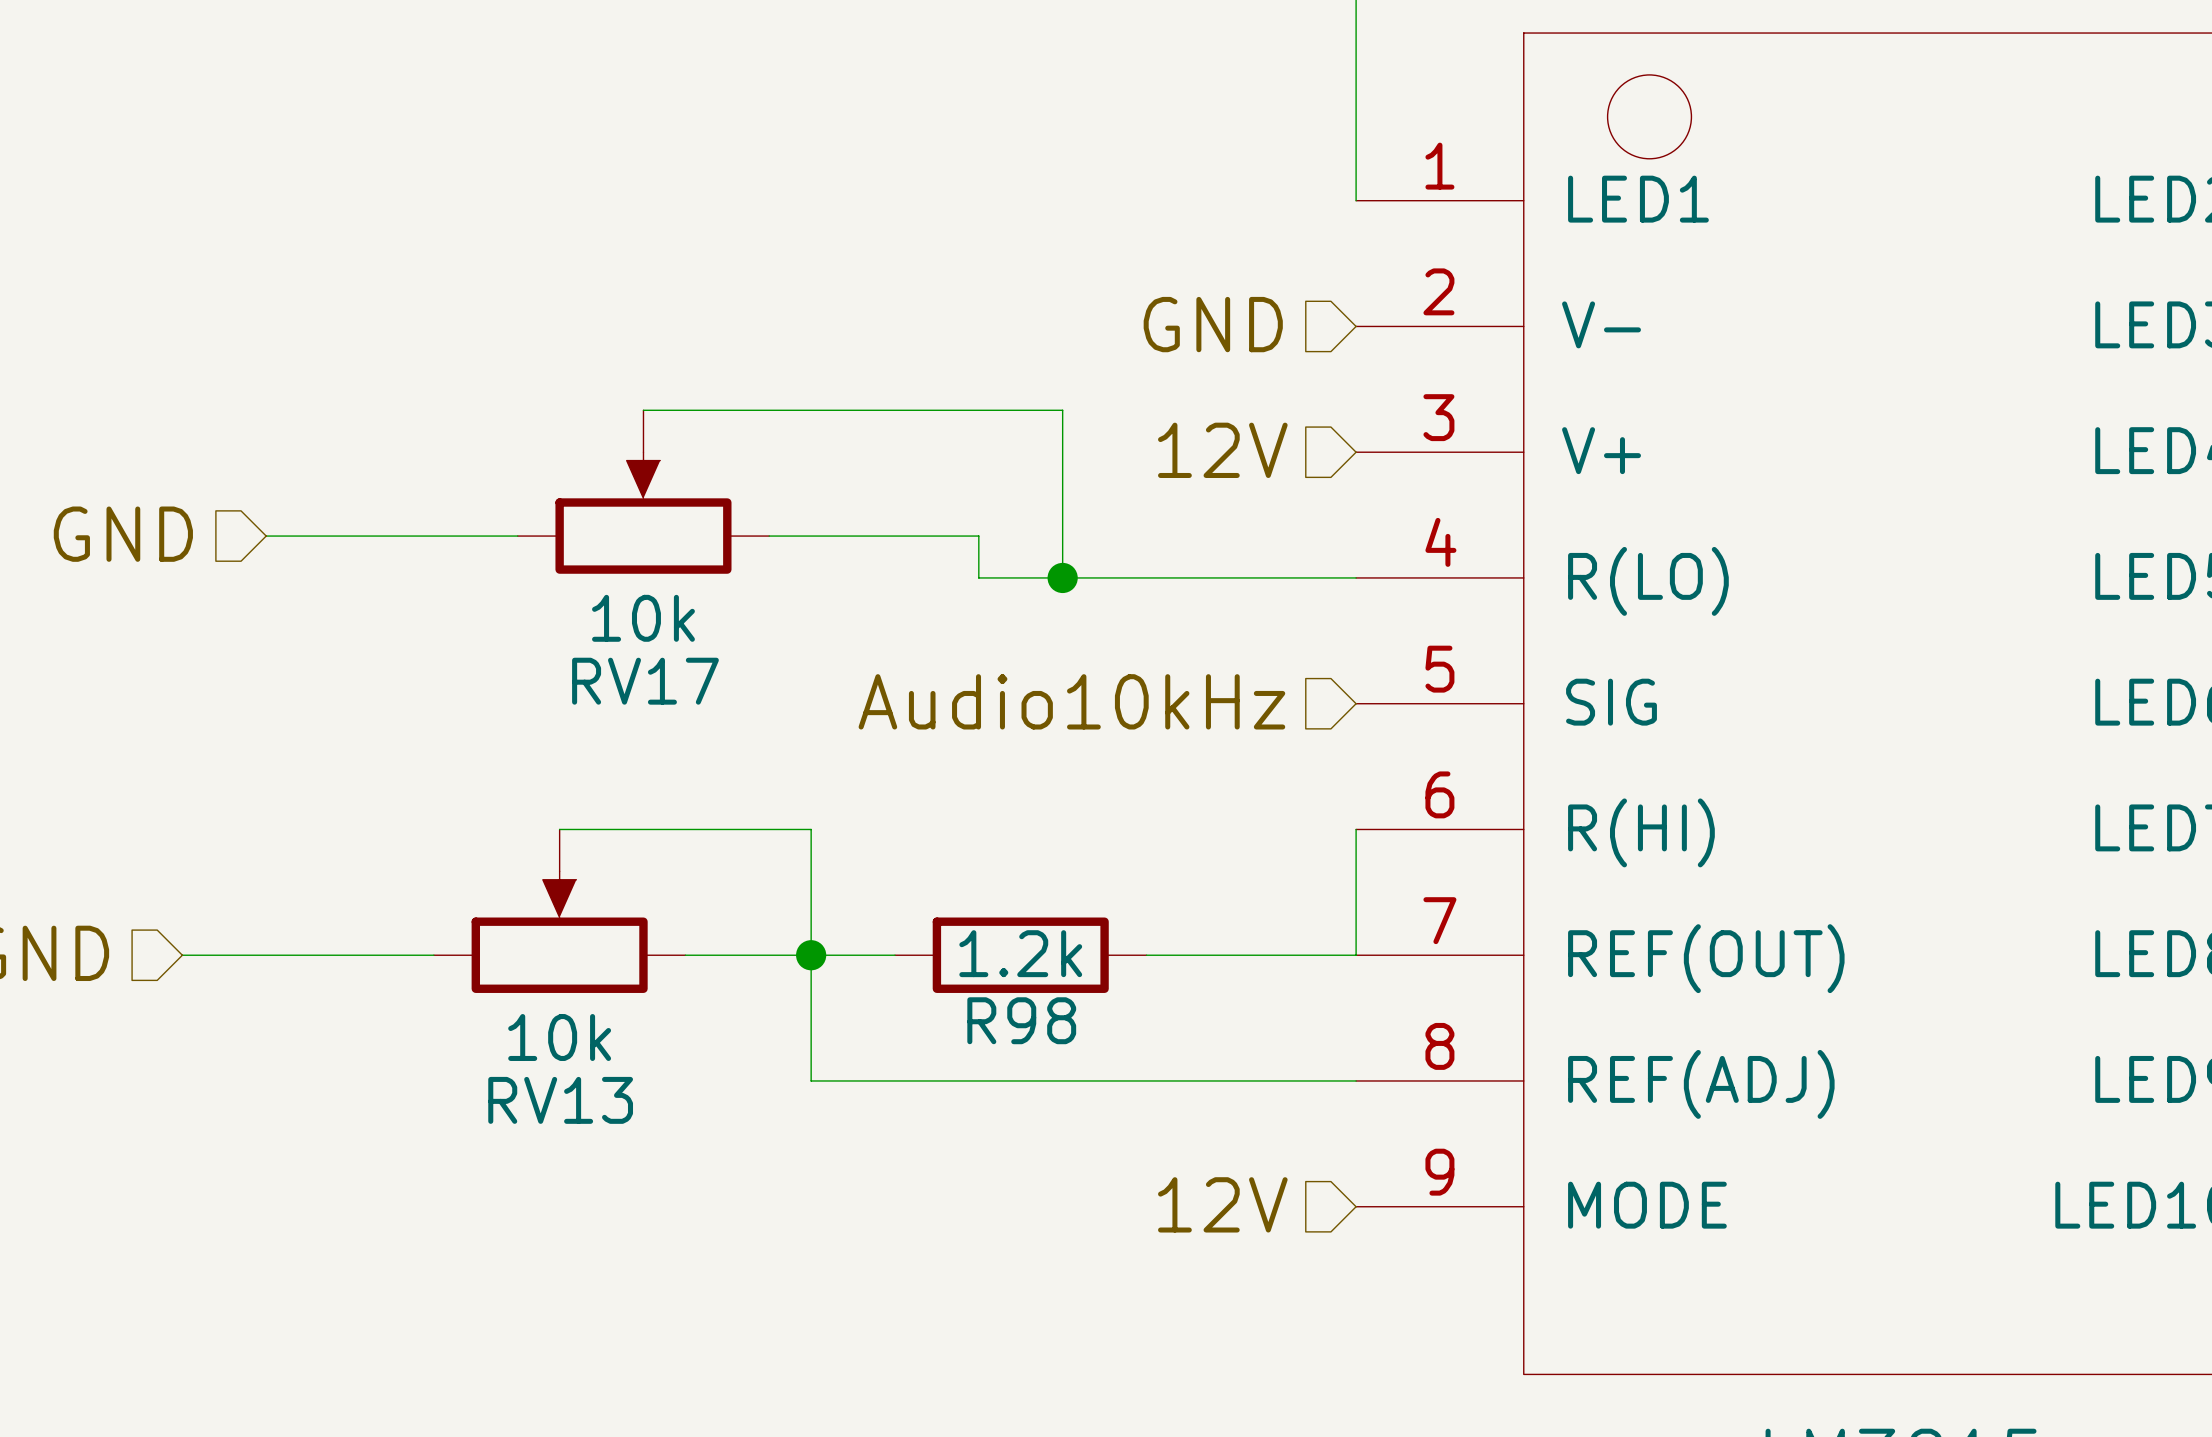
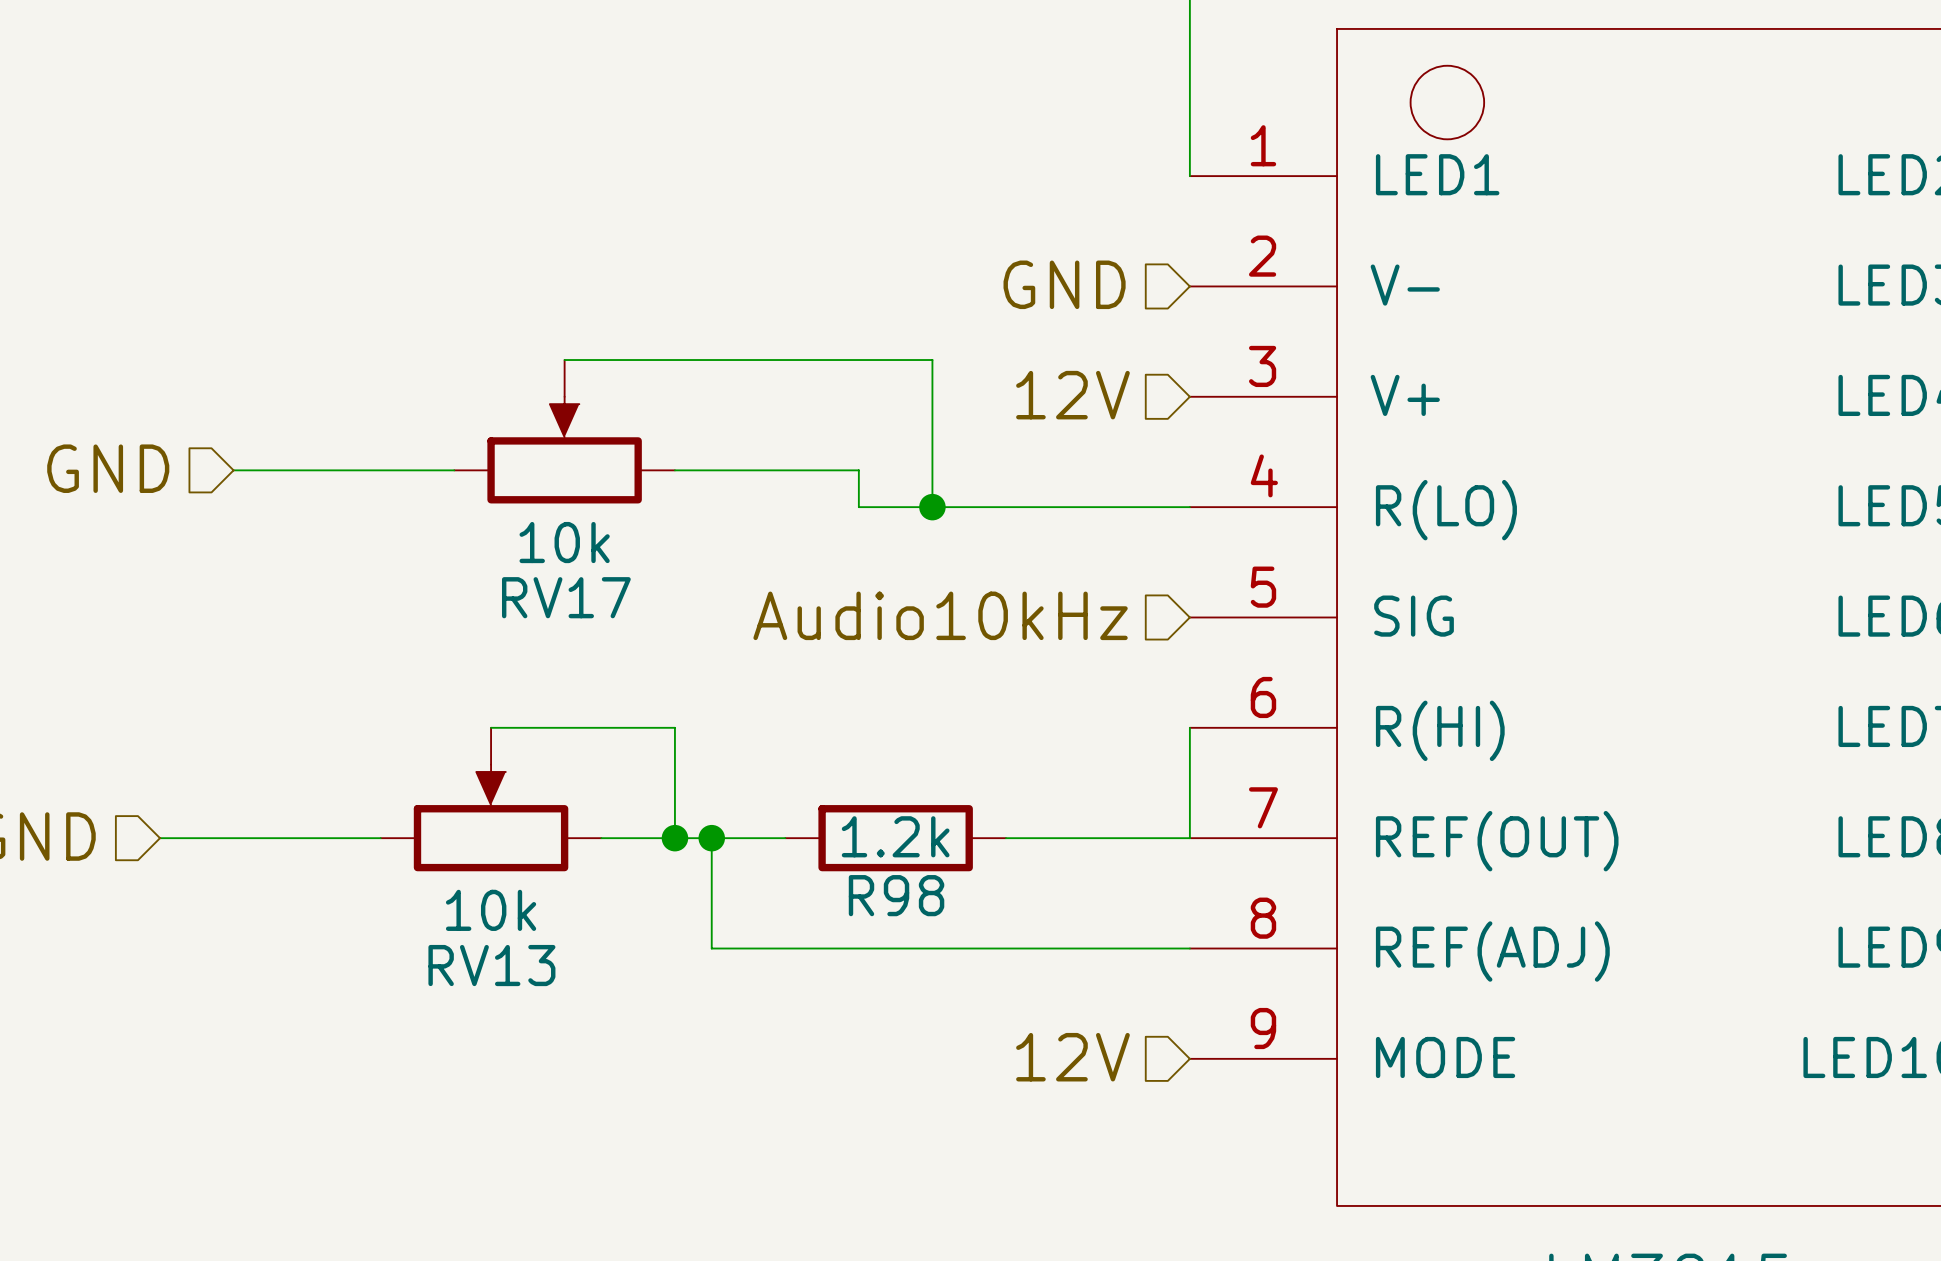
wire: (769, 829) (811, 829) (811, 955) -> (674, 727) (674, 838)
junction: none -> (674, 838)

